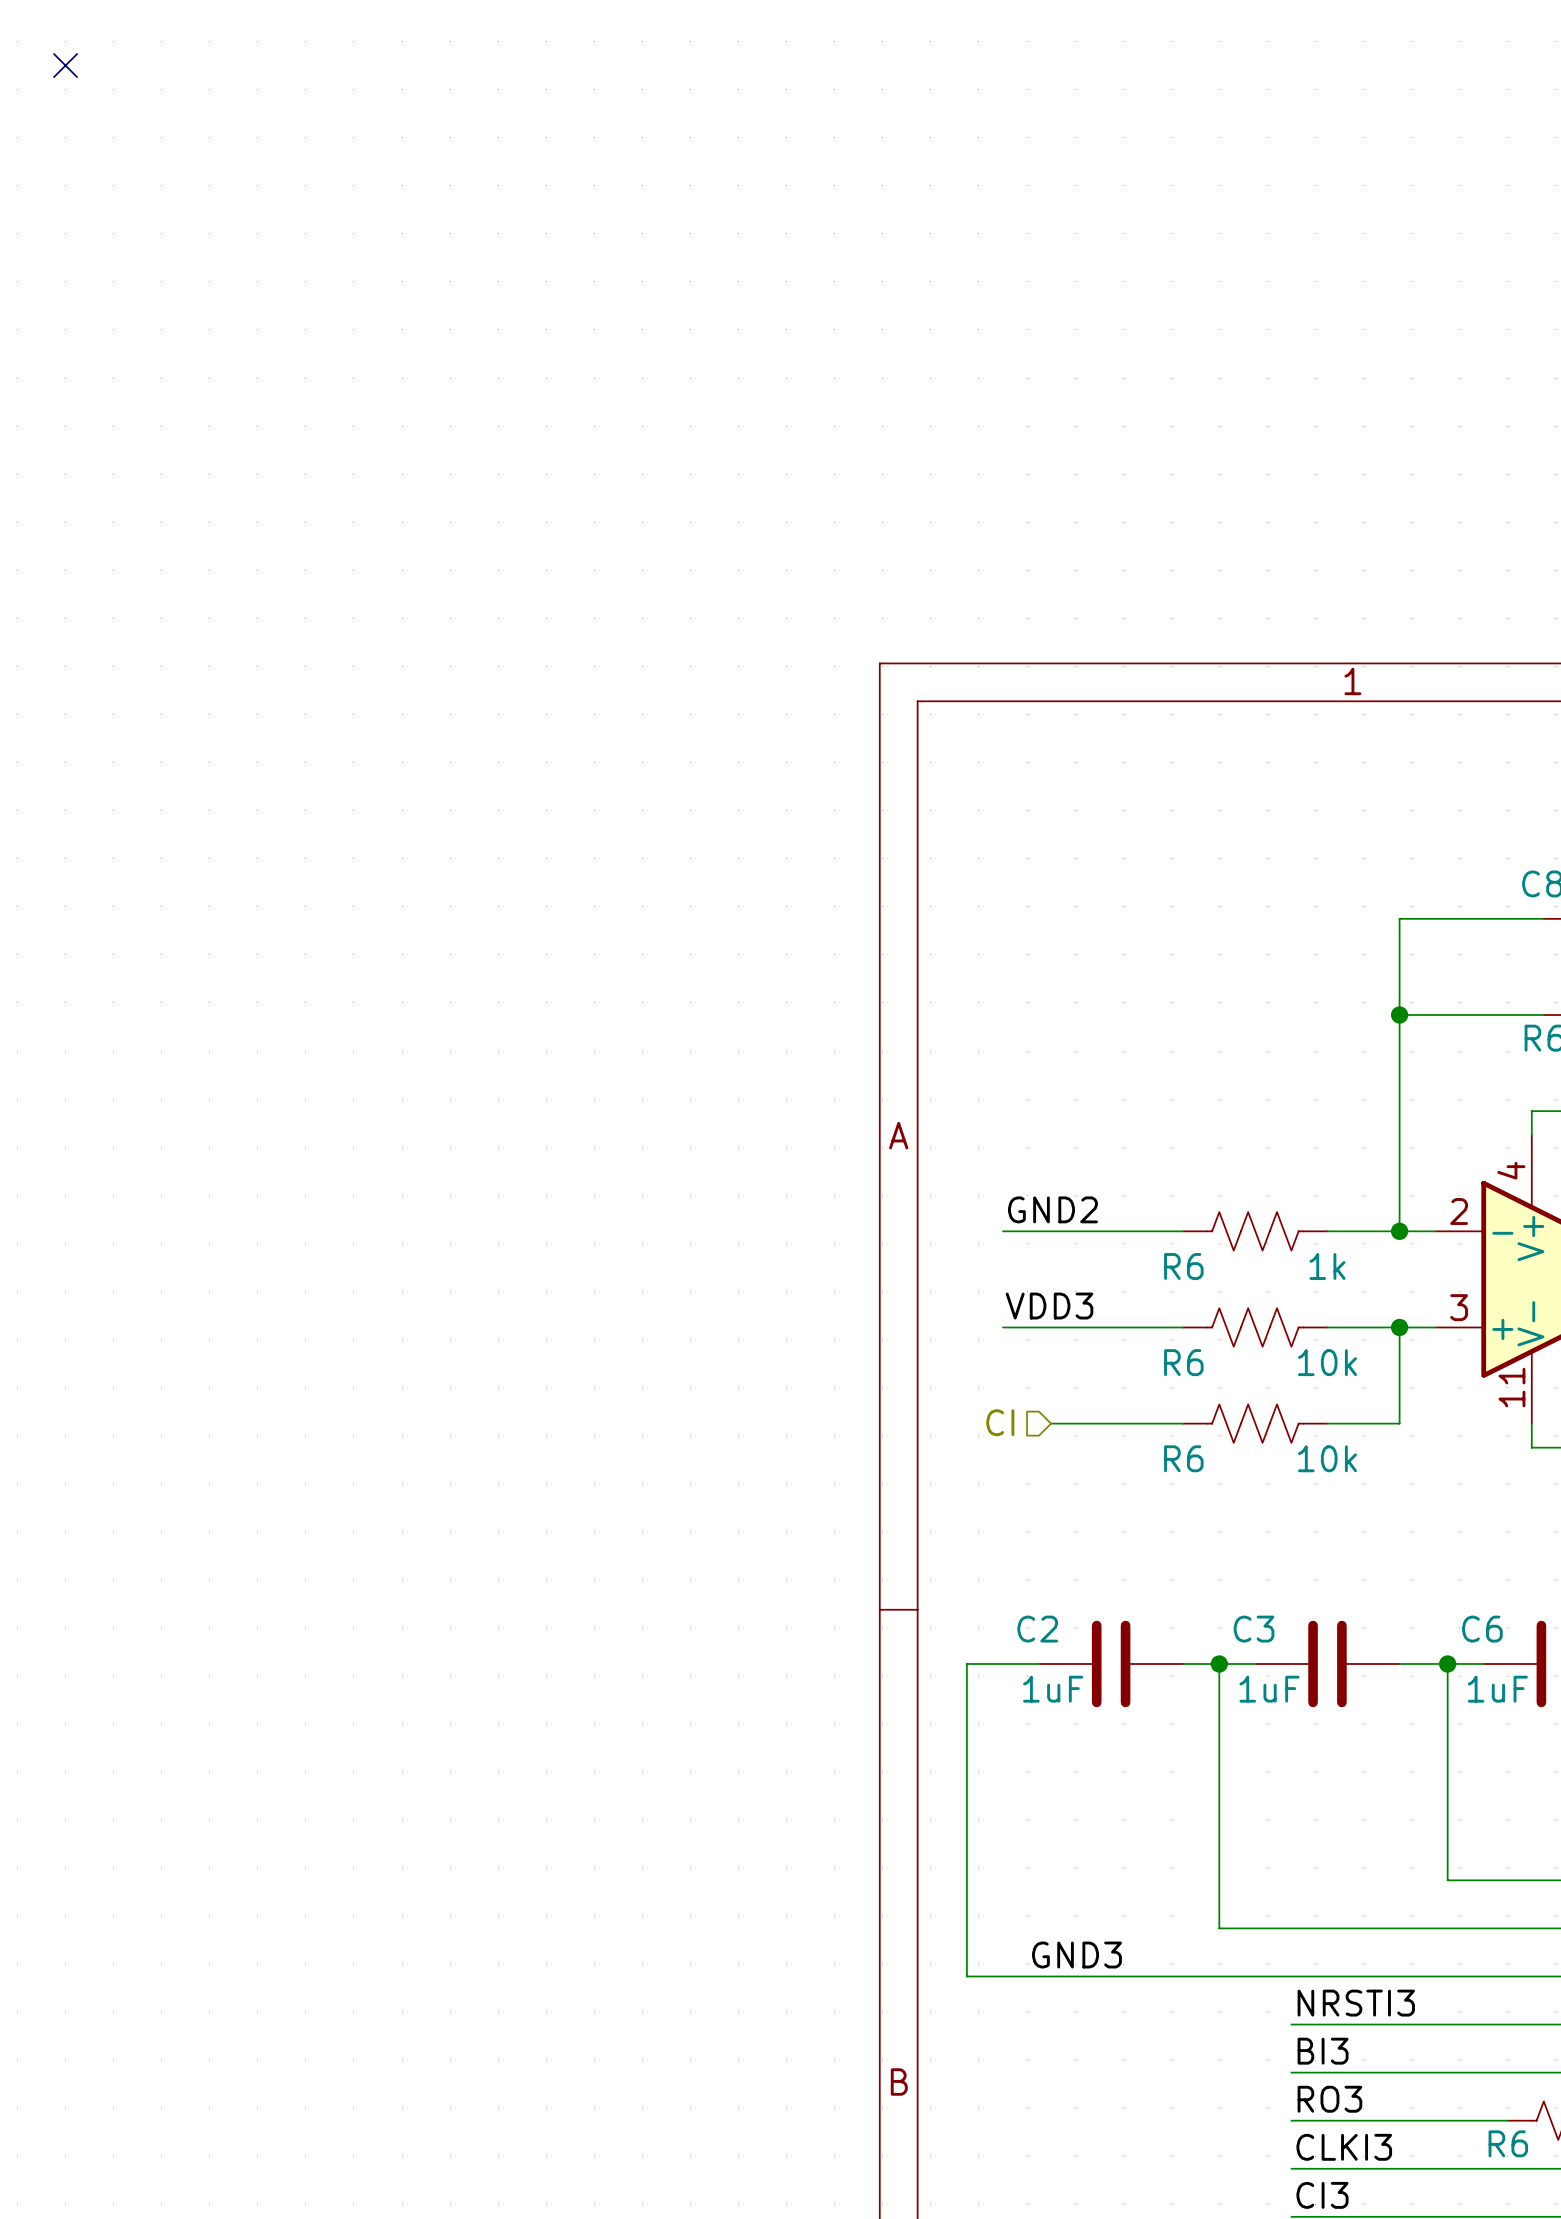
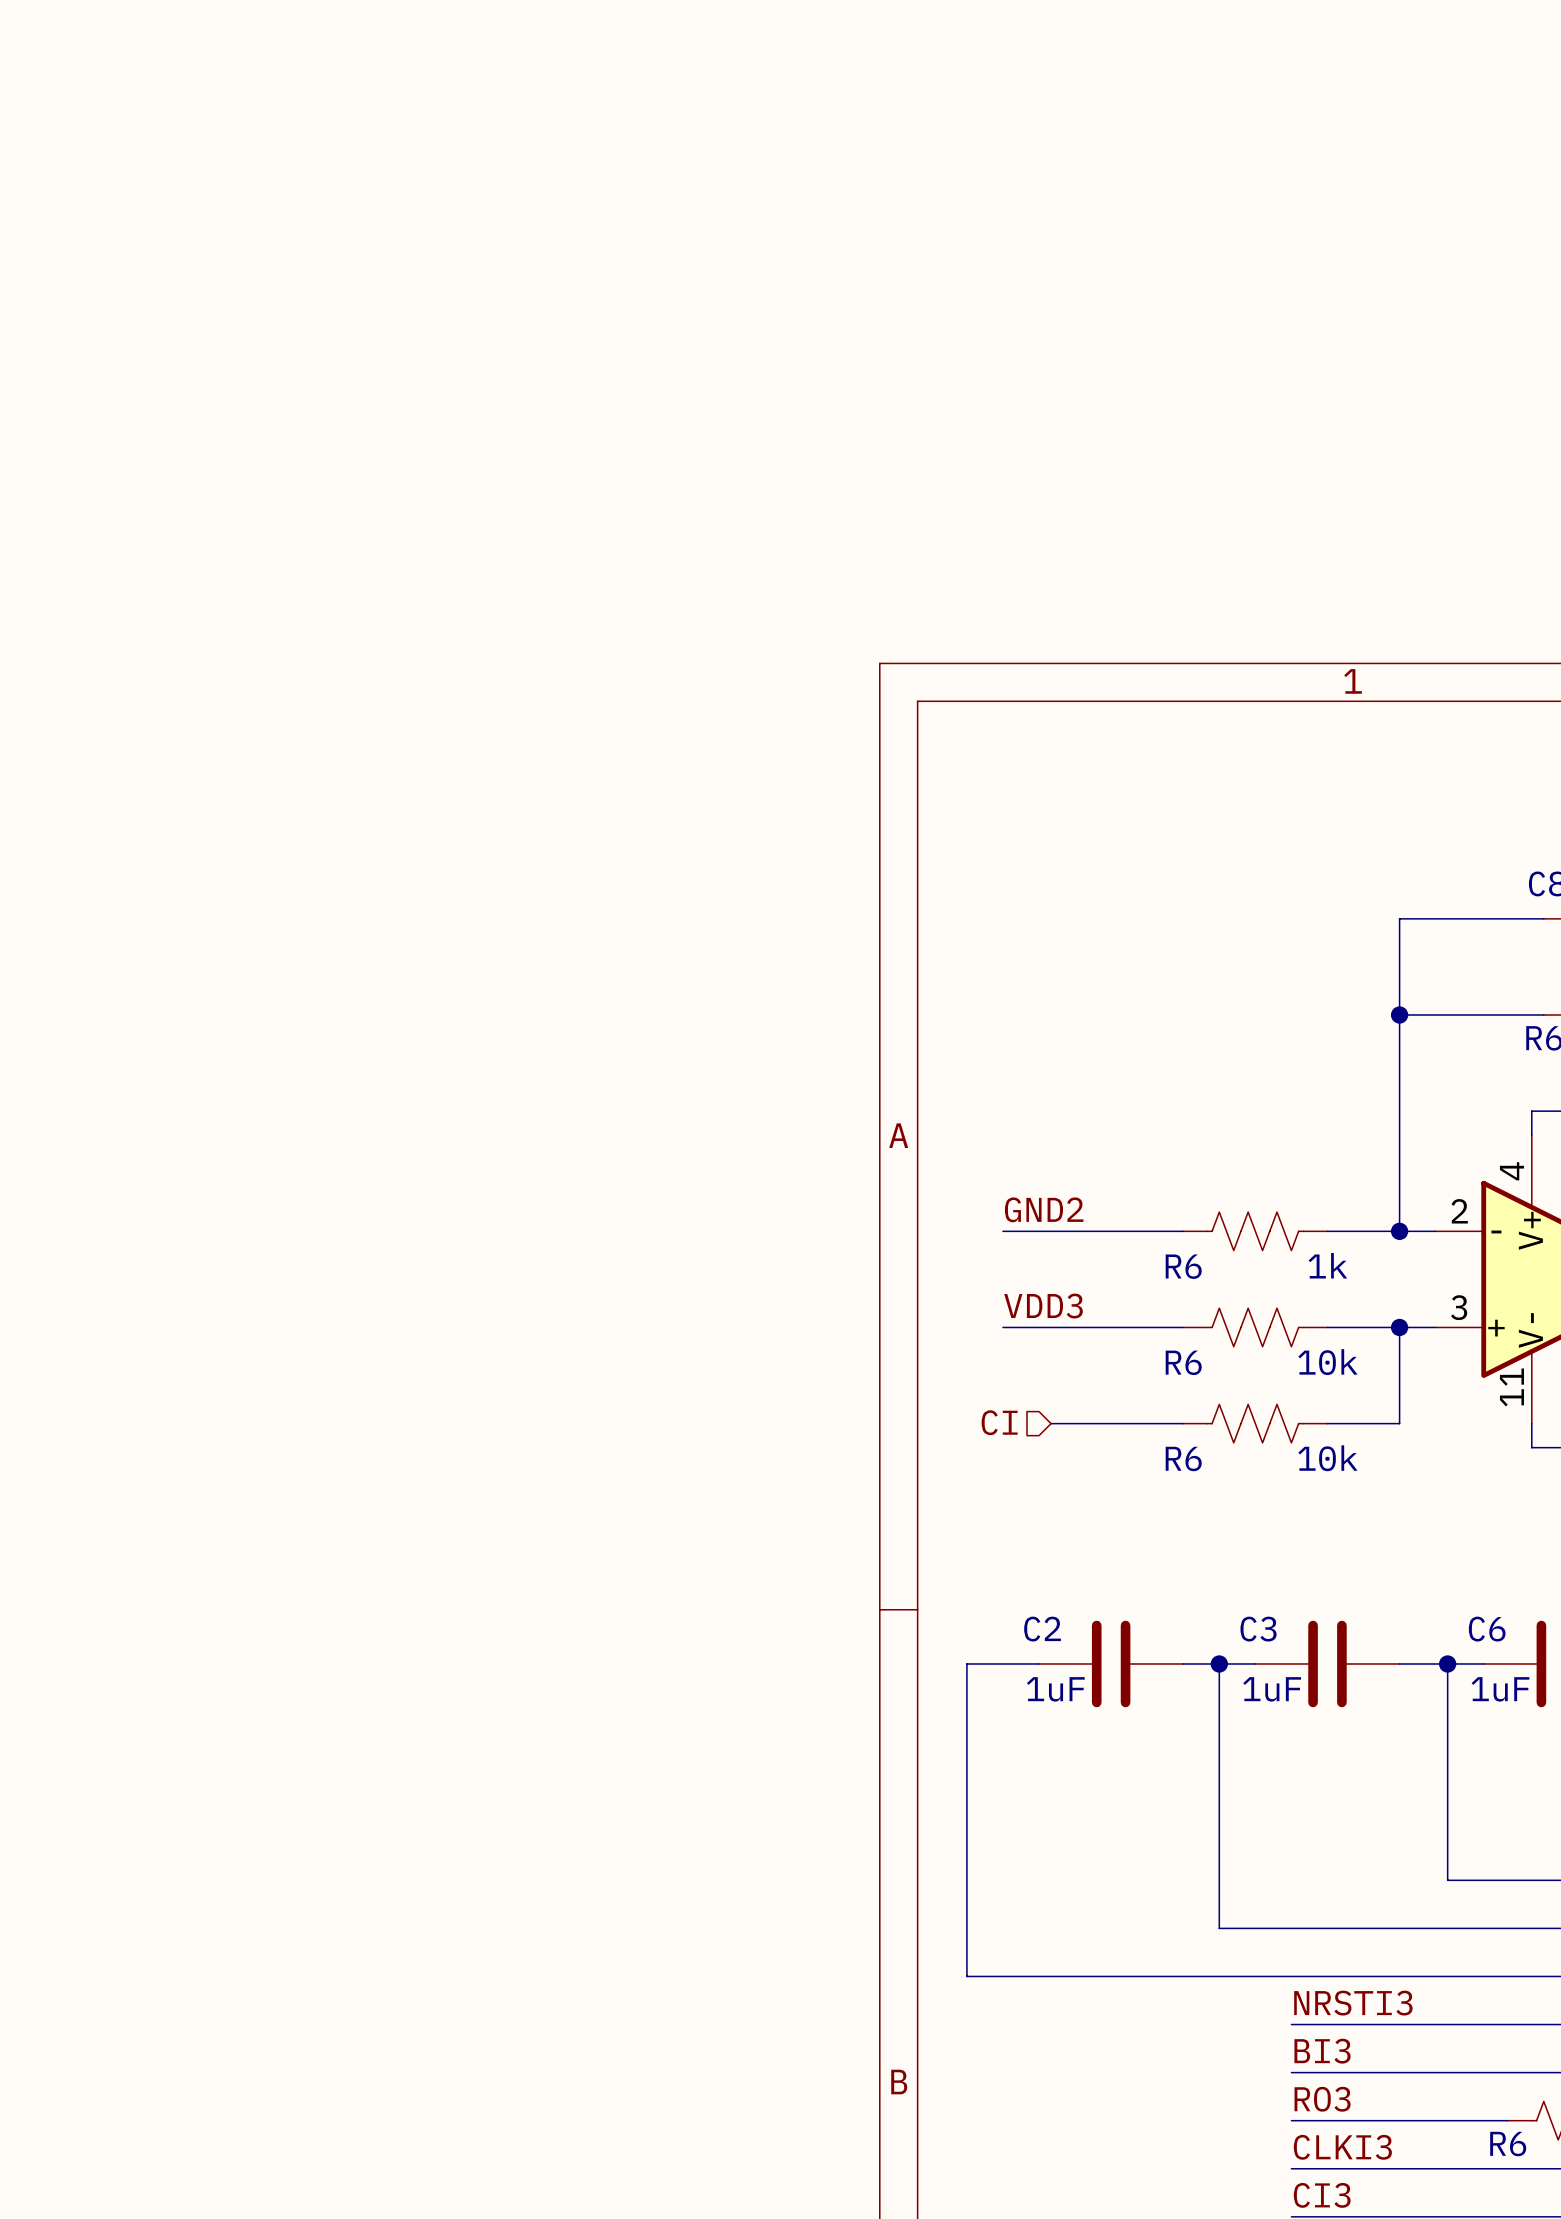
no-connect mark: (65, 65) -> none
label: GND3 (1076, 1955) -> none

